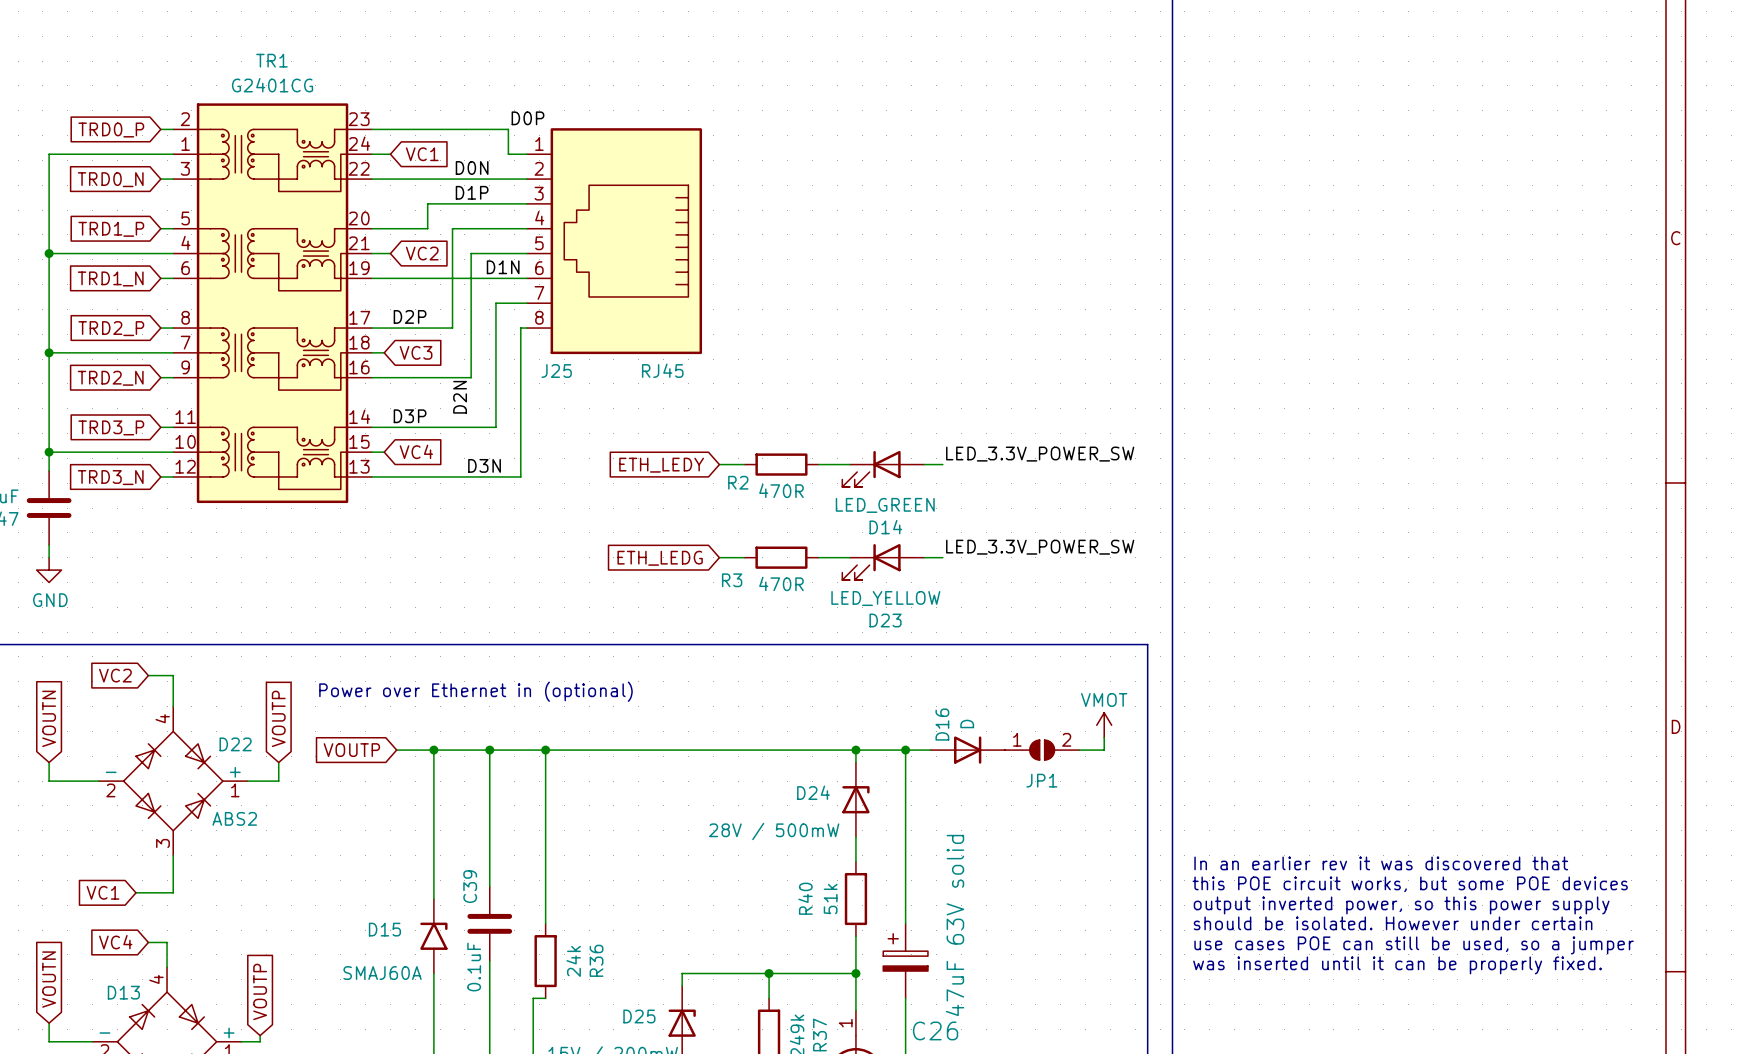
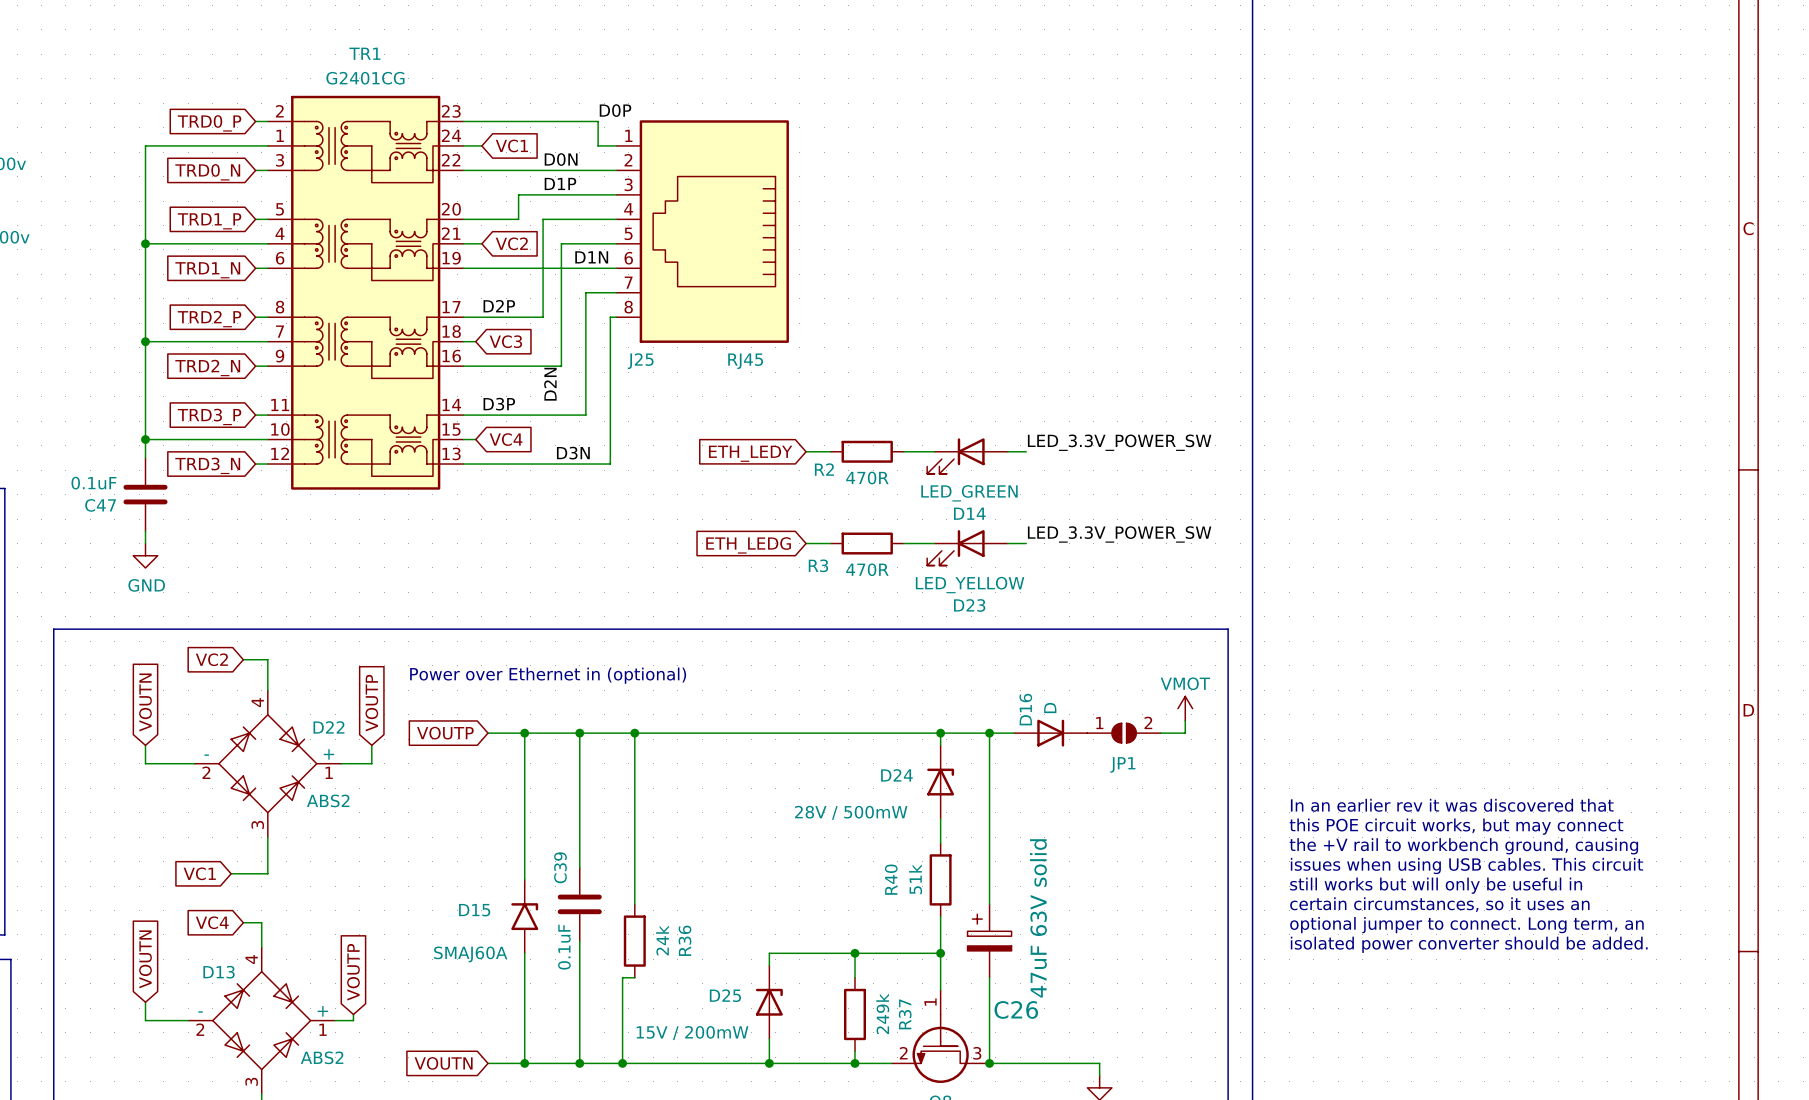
text: none -> this POE circuit works, but may connect (1456, 826)
text position: In an earlier rev it was discovered that (1381, 863) -> In an earlier rev it was discovered that (1452, 805)
text: none -> the +V rail to workbench ground, causing (1463, 846)
text: this POE circuit works, but some POE devices (1410, 884) -> none
text: none -> issues when using USB cables. This circuit (1467, 866)
text: none -> still works but will only be useful in (1436, 885)
text: output inverted power, so this power supply (1401, 905) -> none
text: should be isolated. However under certain (1393, 923) -> none
text: none -> certain circumstances, so it uses an (1439, 904)
text: none -> optional jumper to connect. Long term, an (1466, 925)
text: use cases POE can still be used, so a jumper (1414, 945) -> none
text: was inserted until it can be properly fixed. (1397, 965) -> none
text: none -> isolated power converter should be added. (1469, 944)

